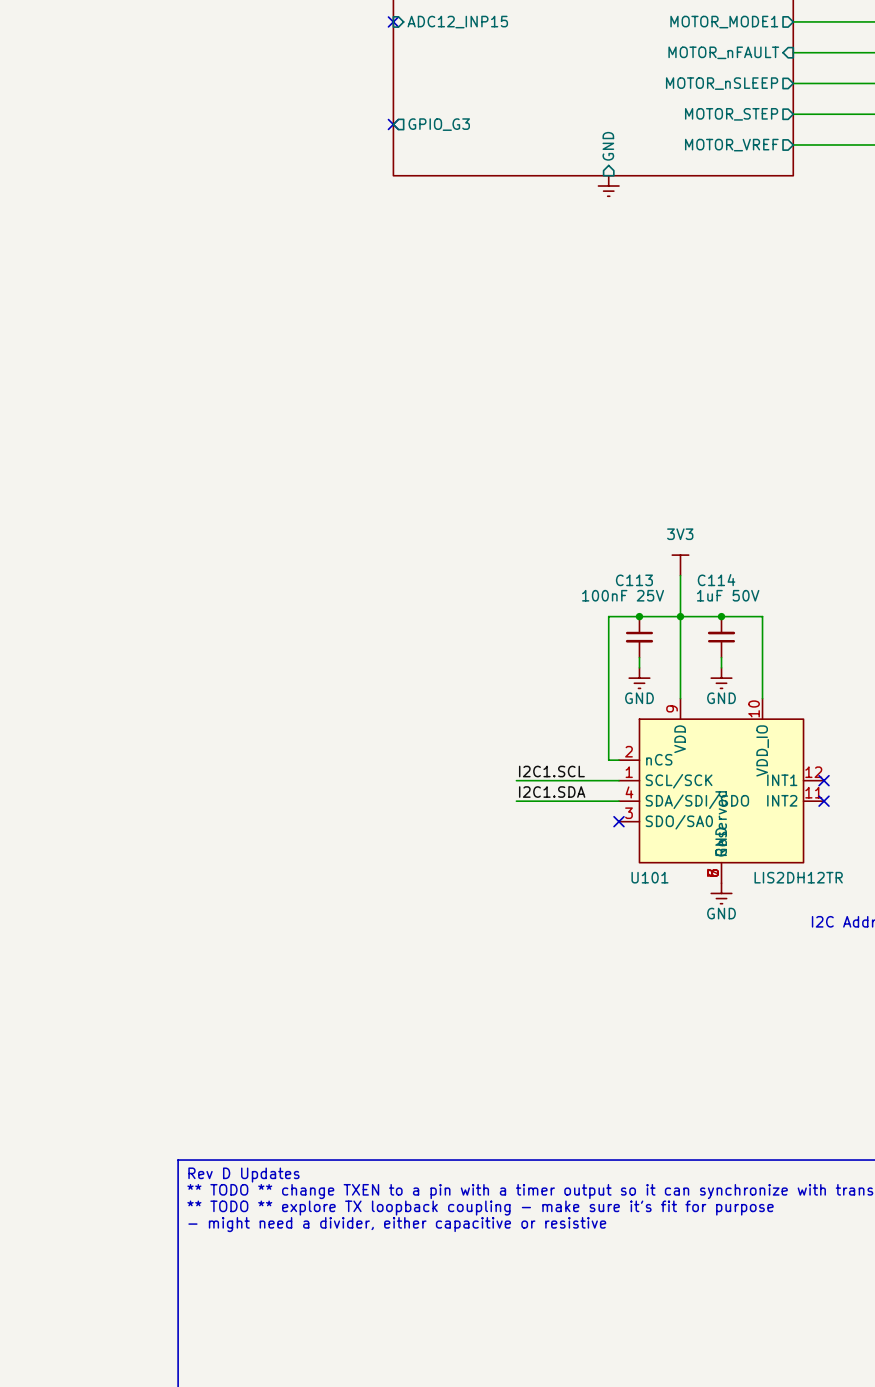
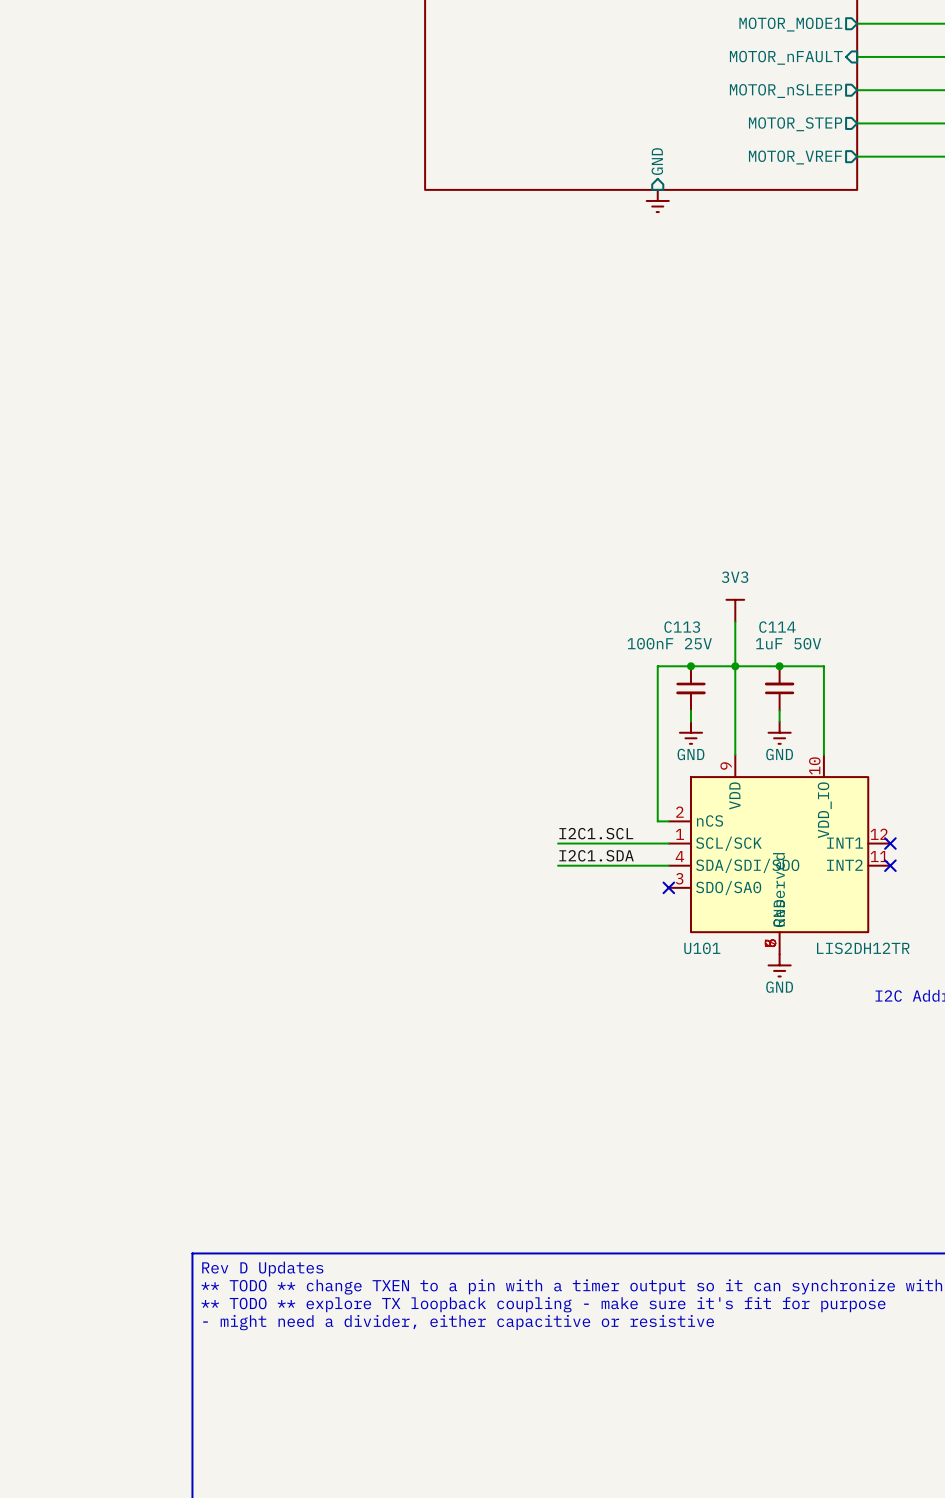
no-connect mark: (393, 21) -> none
sheet pin: ADC12_INP15 (457, 22) -> none
no-connect mark: (393, 124) -> none
sheet pin: GPIO_G3 (439, 124) -> none

